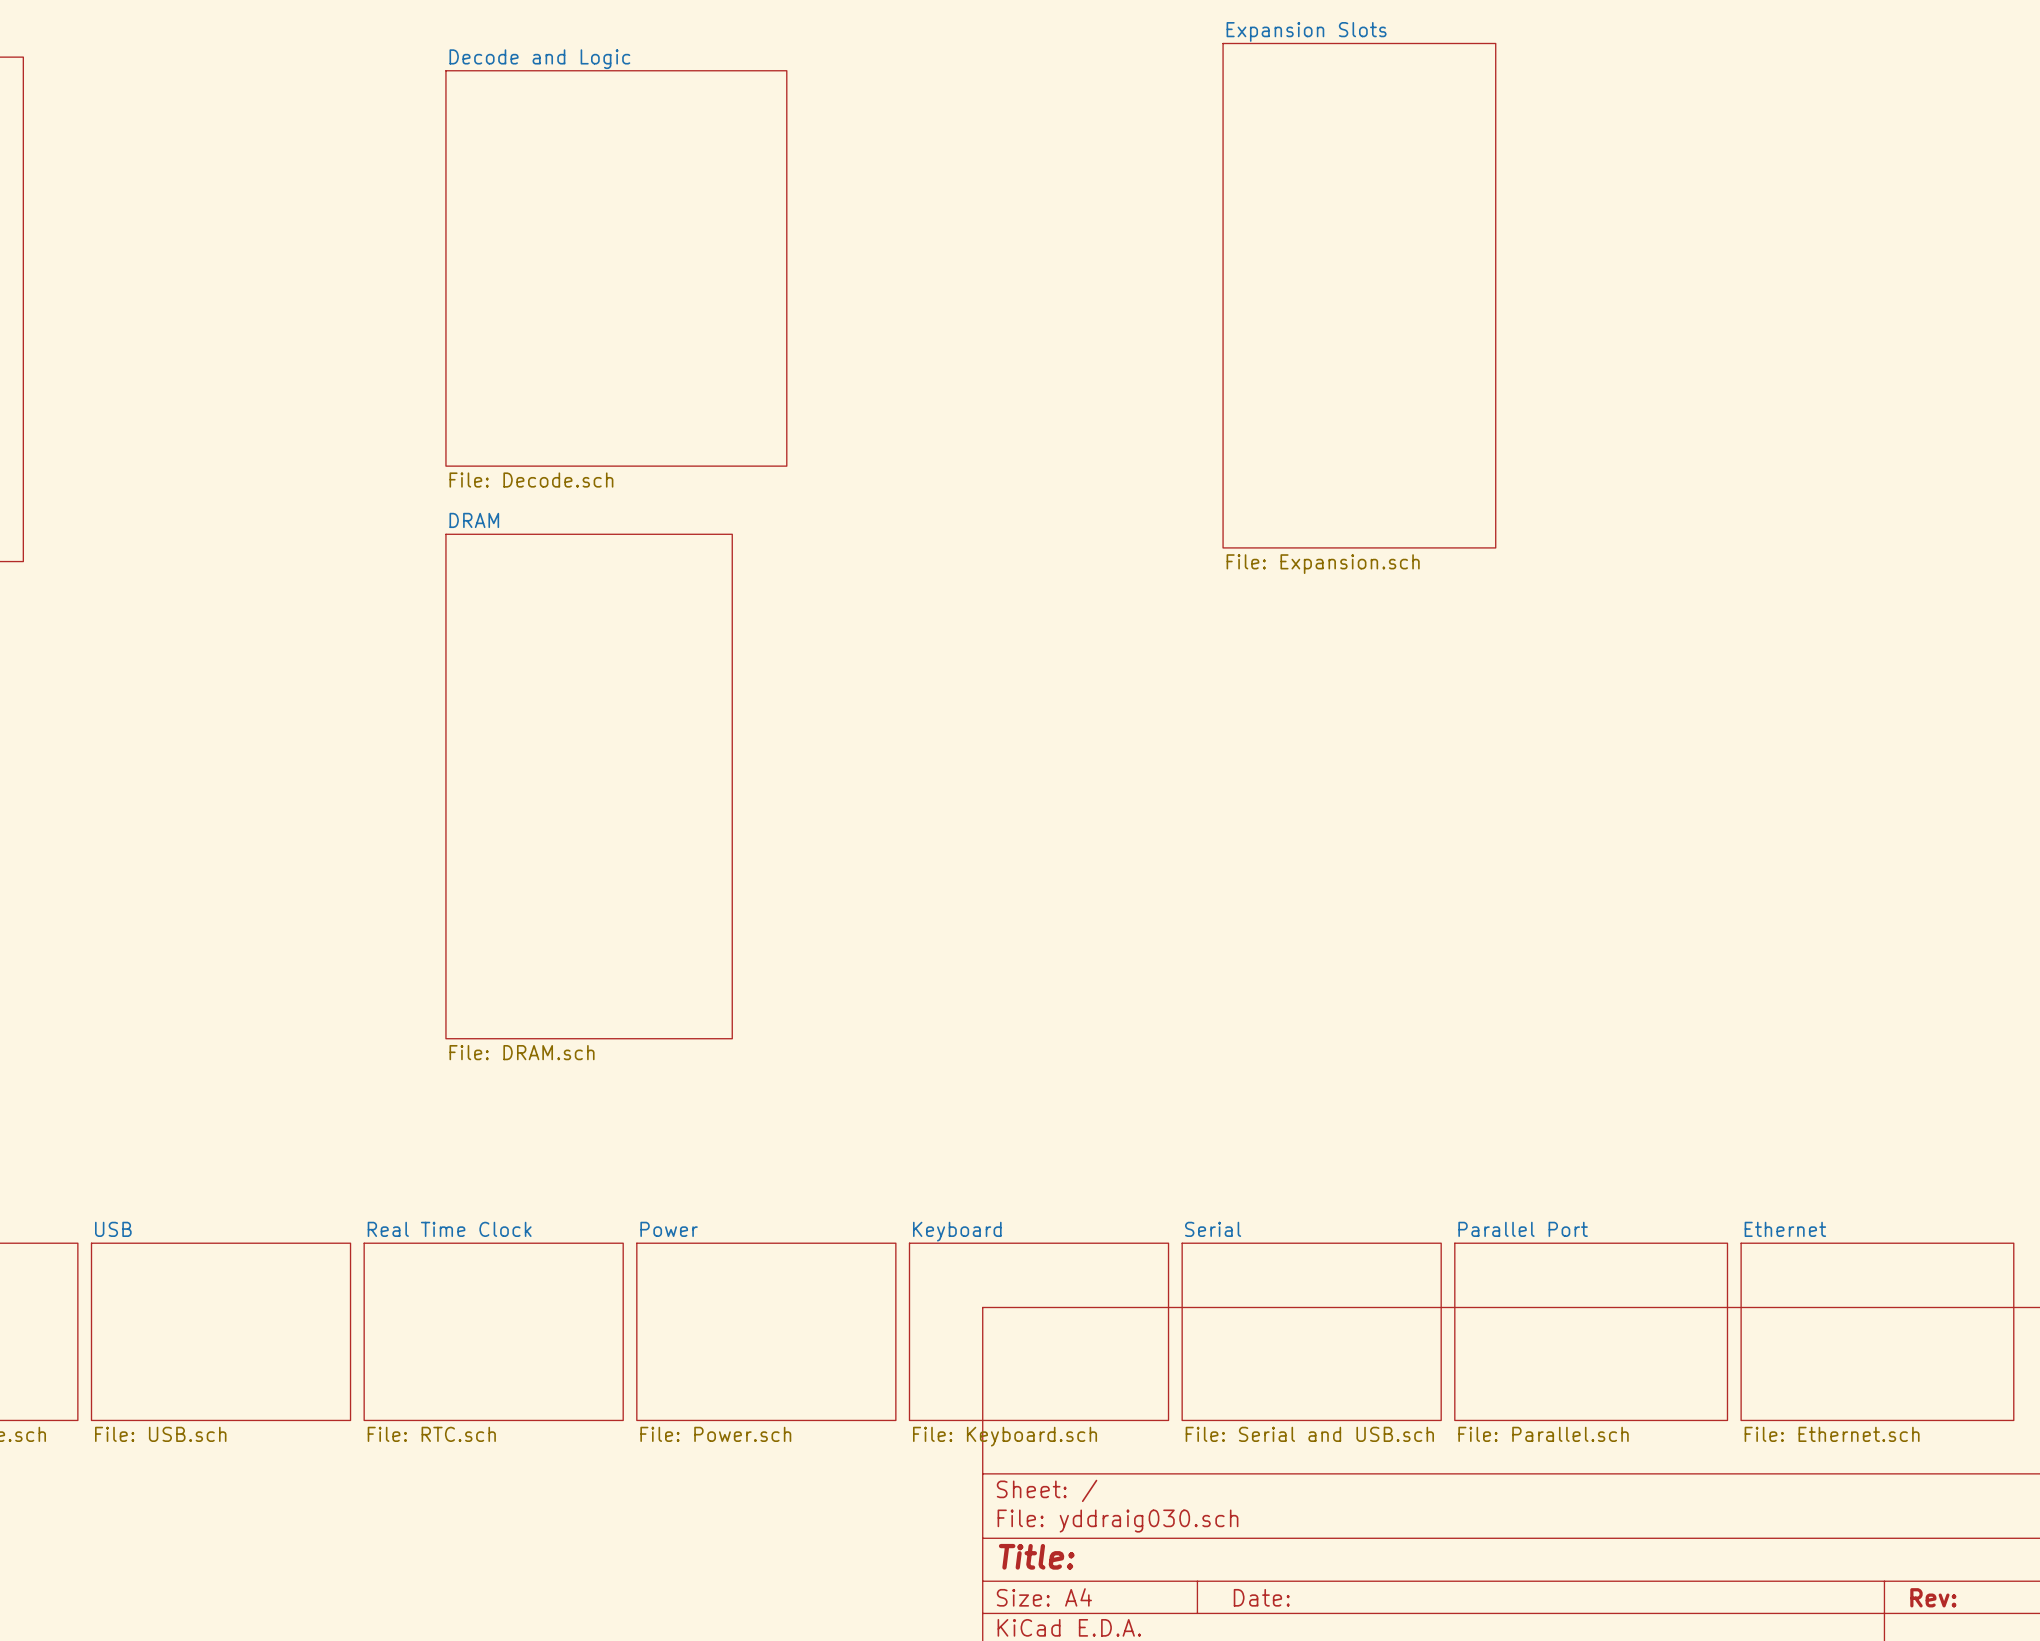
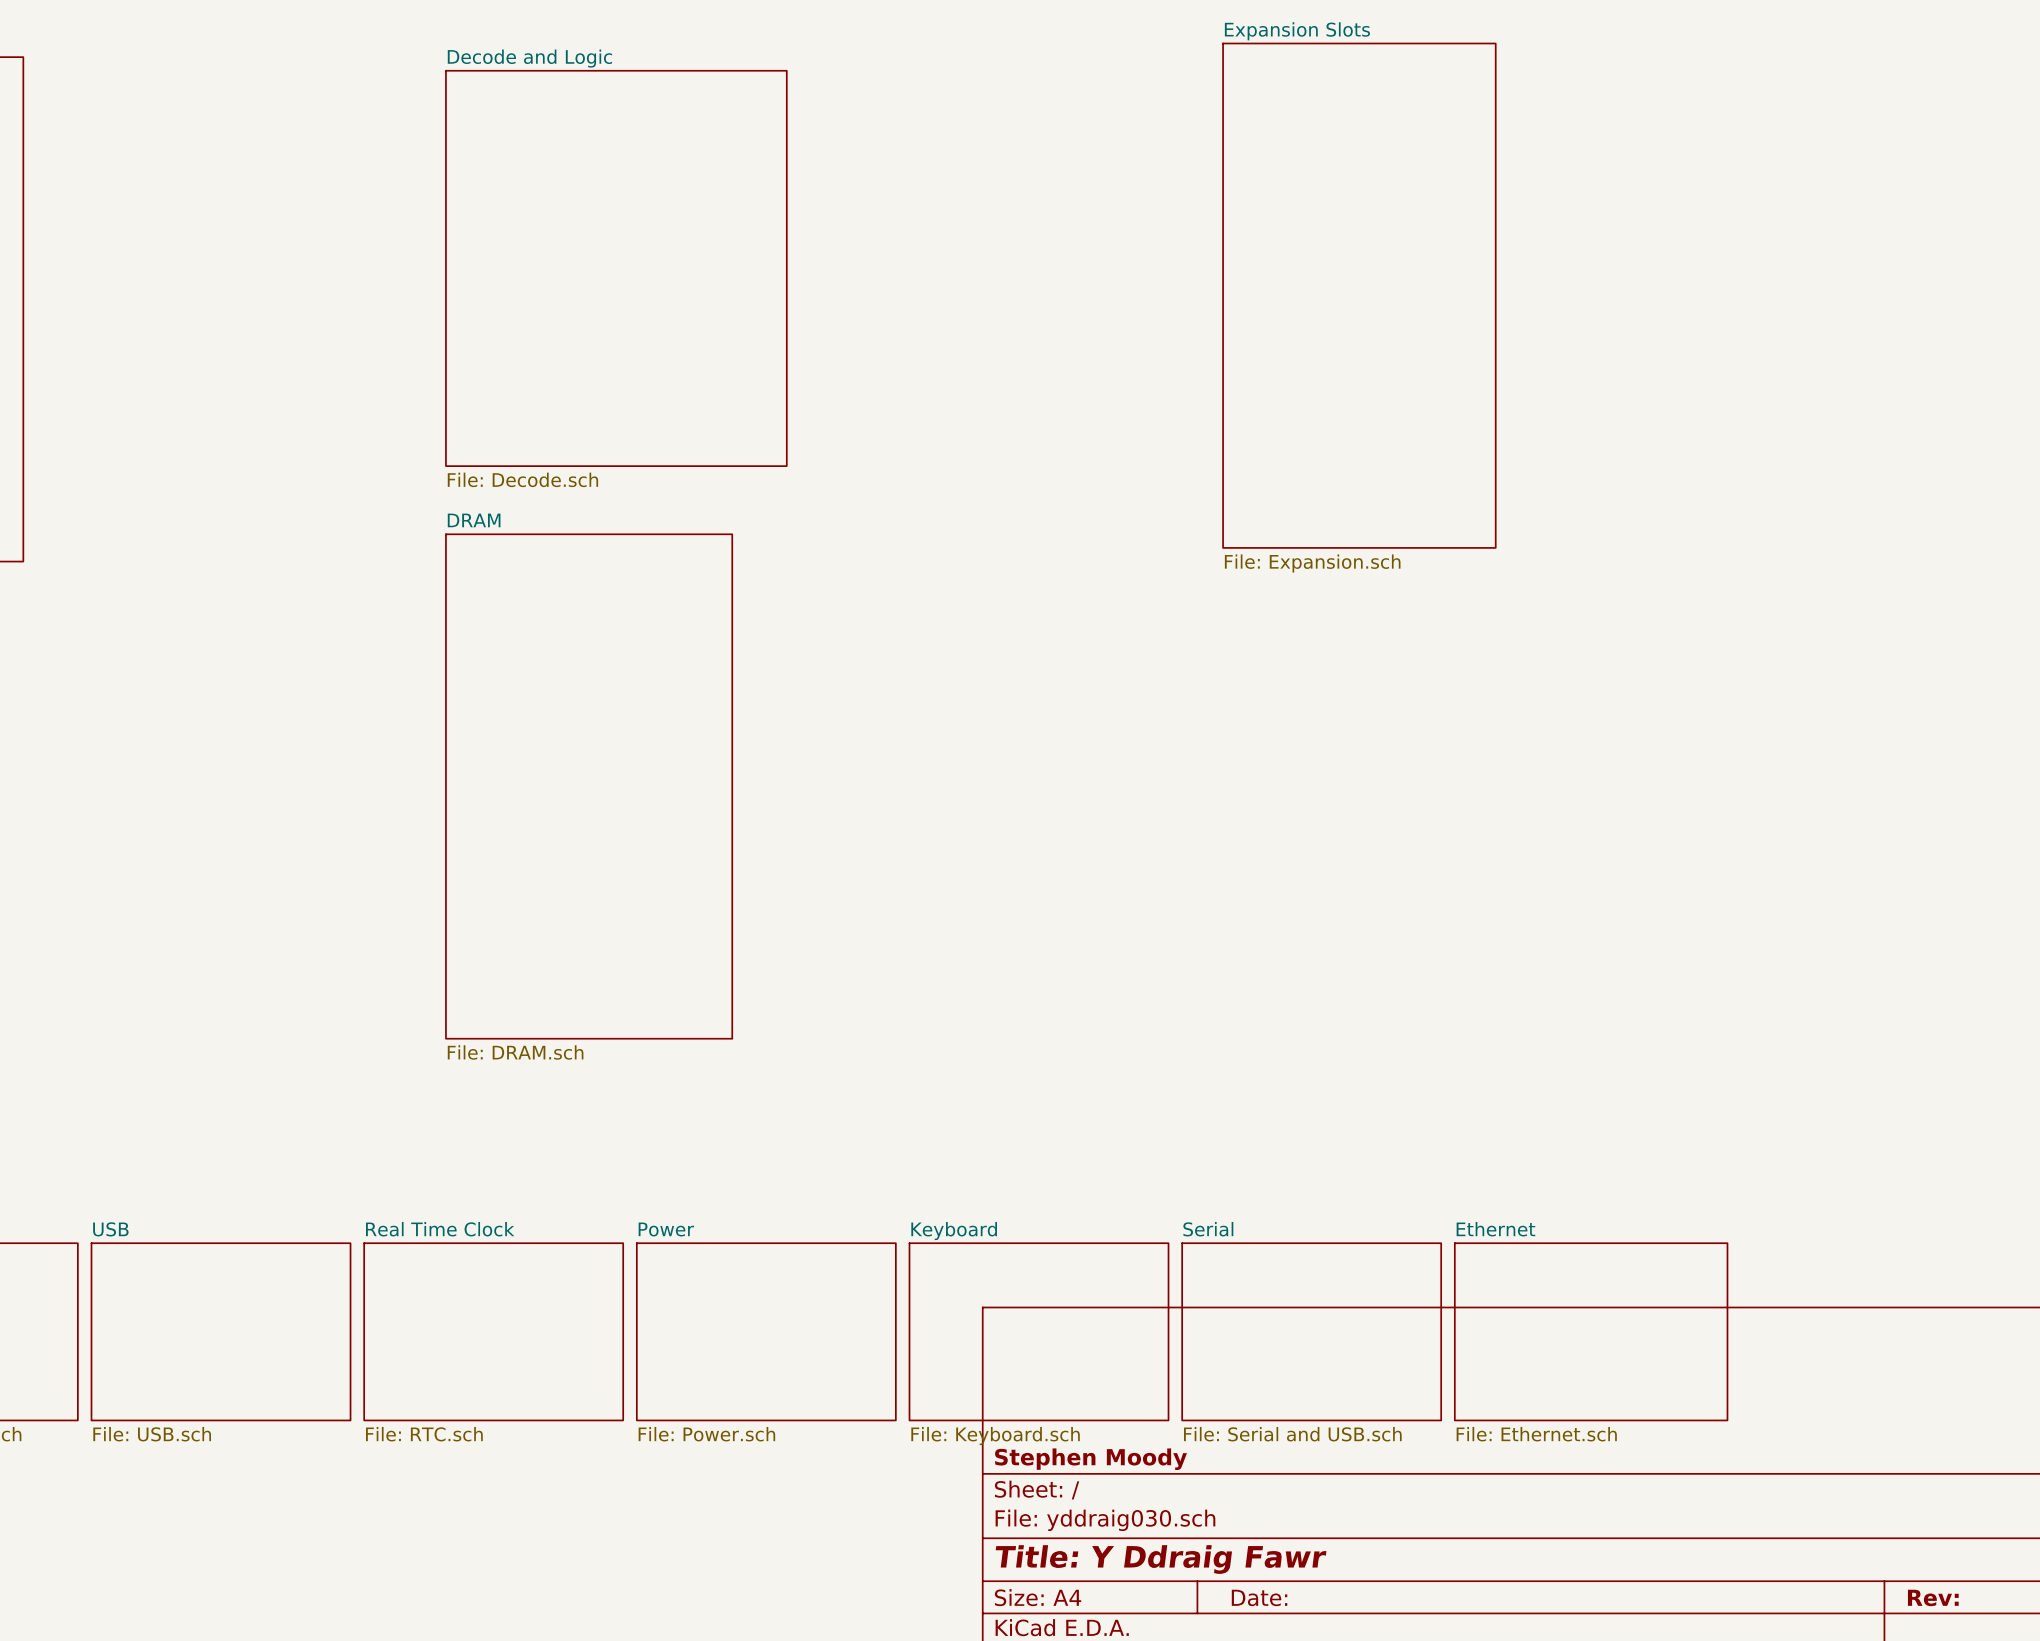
sheet Parallel Port name: Parallel Port (1523, 1229) -> Ethernet (1495, 1229)
sheet Ethernet: File: Ethernet.sch (1877, 1331) -> none
sheet Parallel Port value: File: Parallel.sch (1543, 1434) -> File: Ethernet.sch (1536, 1434)
title block: none -> Stephen Moody (1091, 1459)
title block: Title: (1036, 1556) -> Title: Y Ddraig Fawr (1161, 1559)

